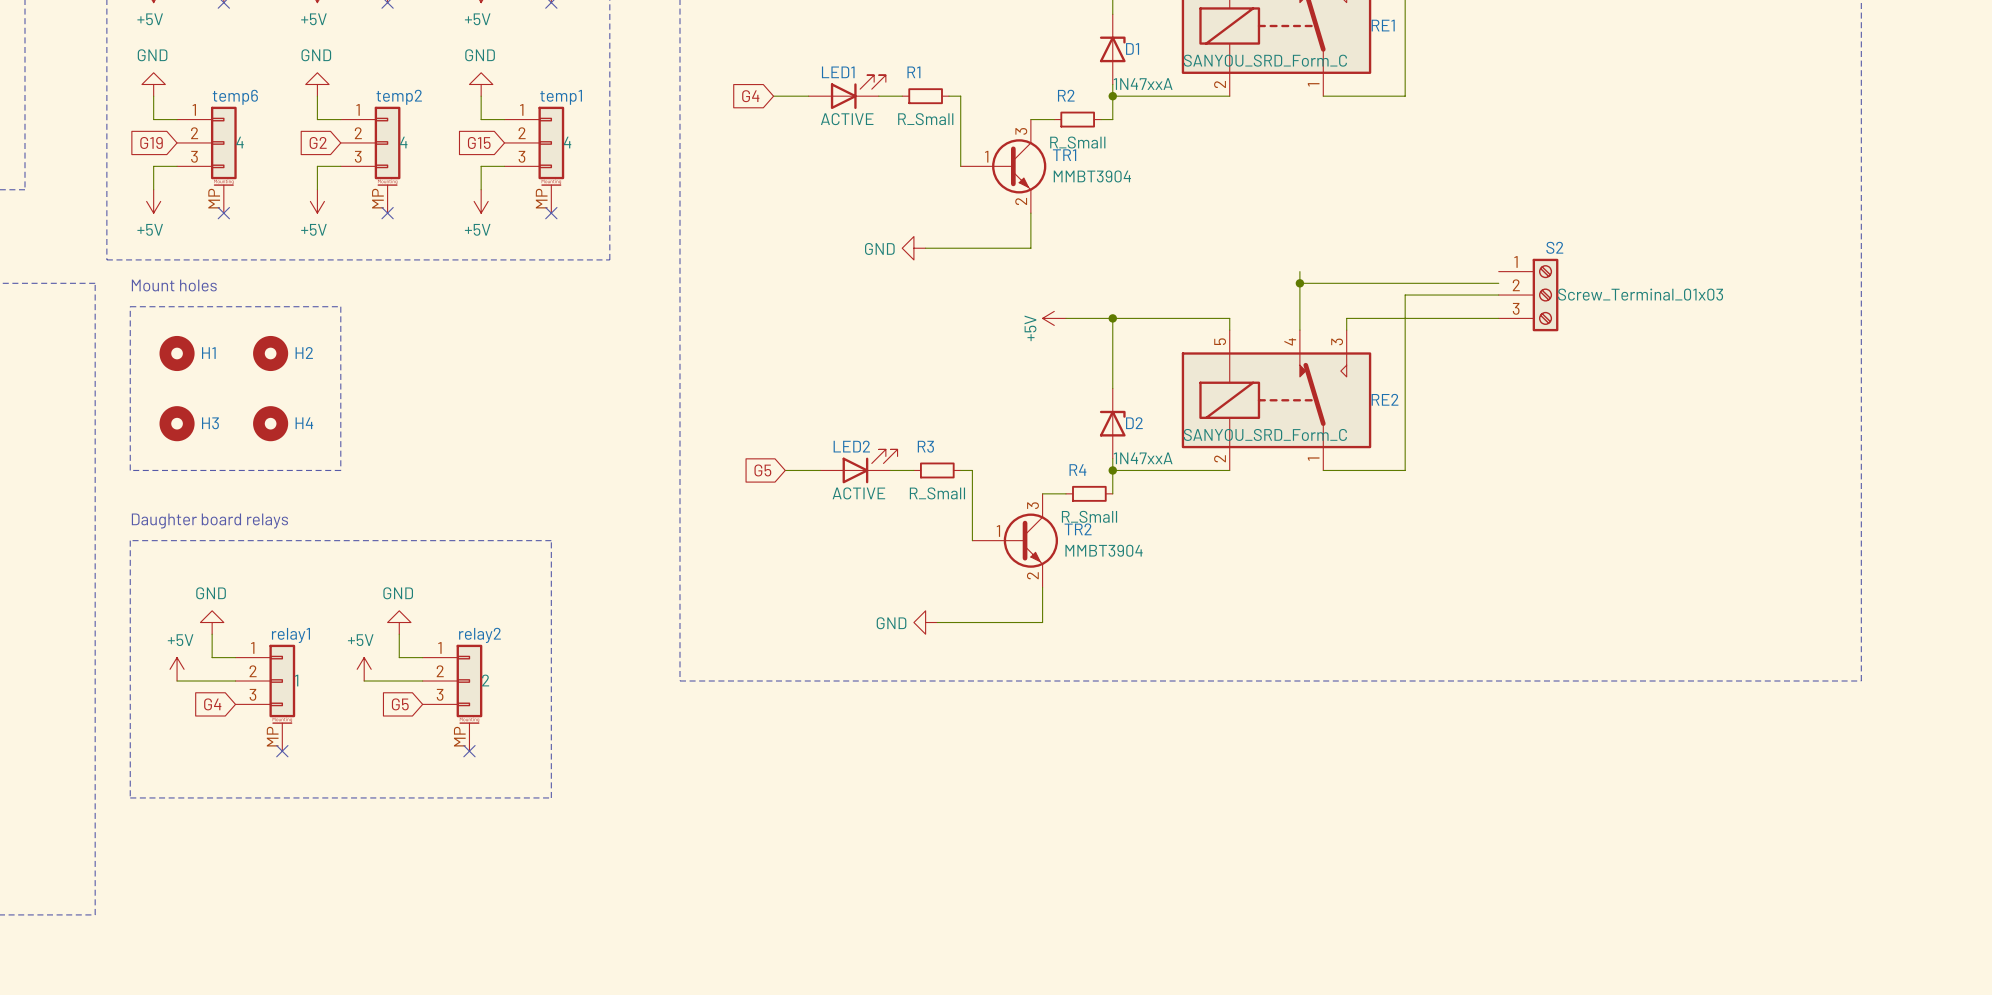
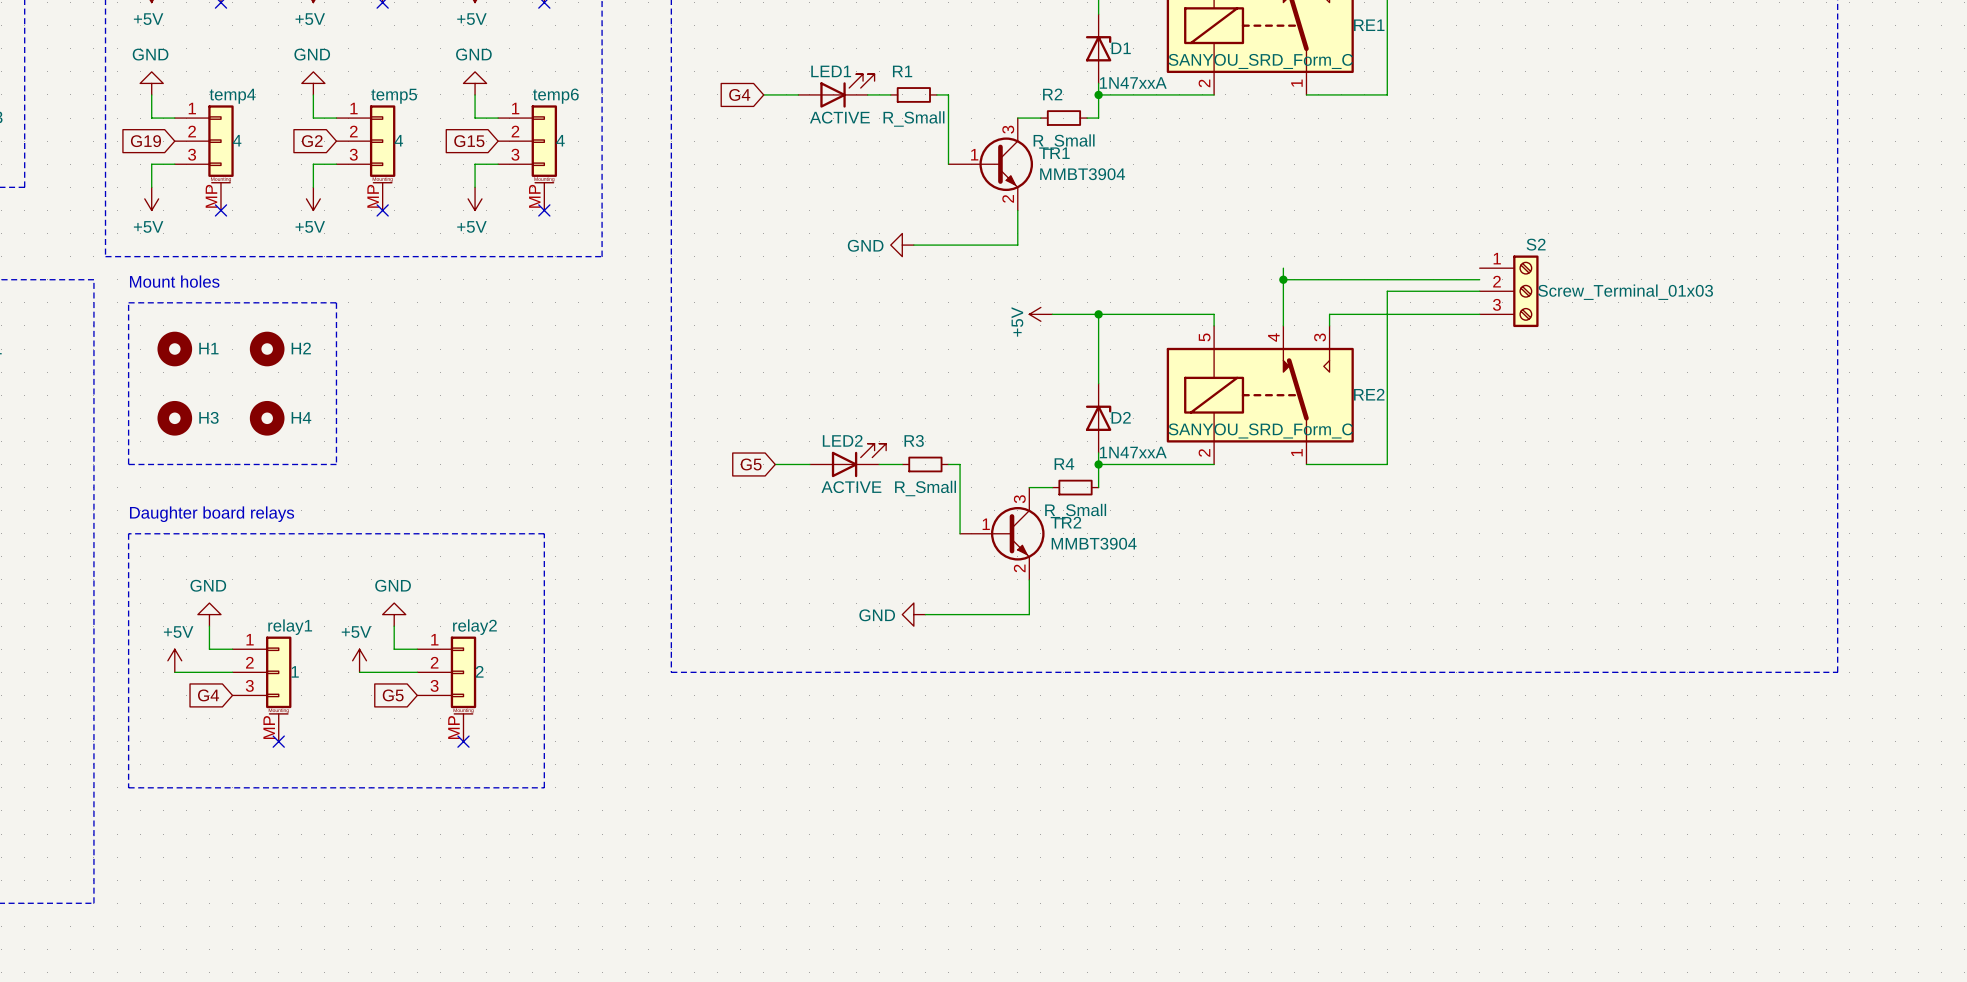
temp6 name: temp6 (235, 97) -> temp4 (232, 96)
temp2 name: temp2 (399, 97) -> temp5 (394, 96)
temp1 name: temp1 (561, 97) -> temp6 (555, 96)

